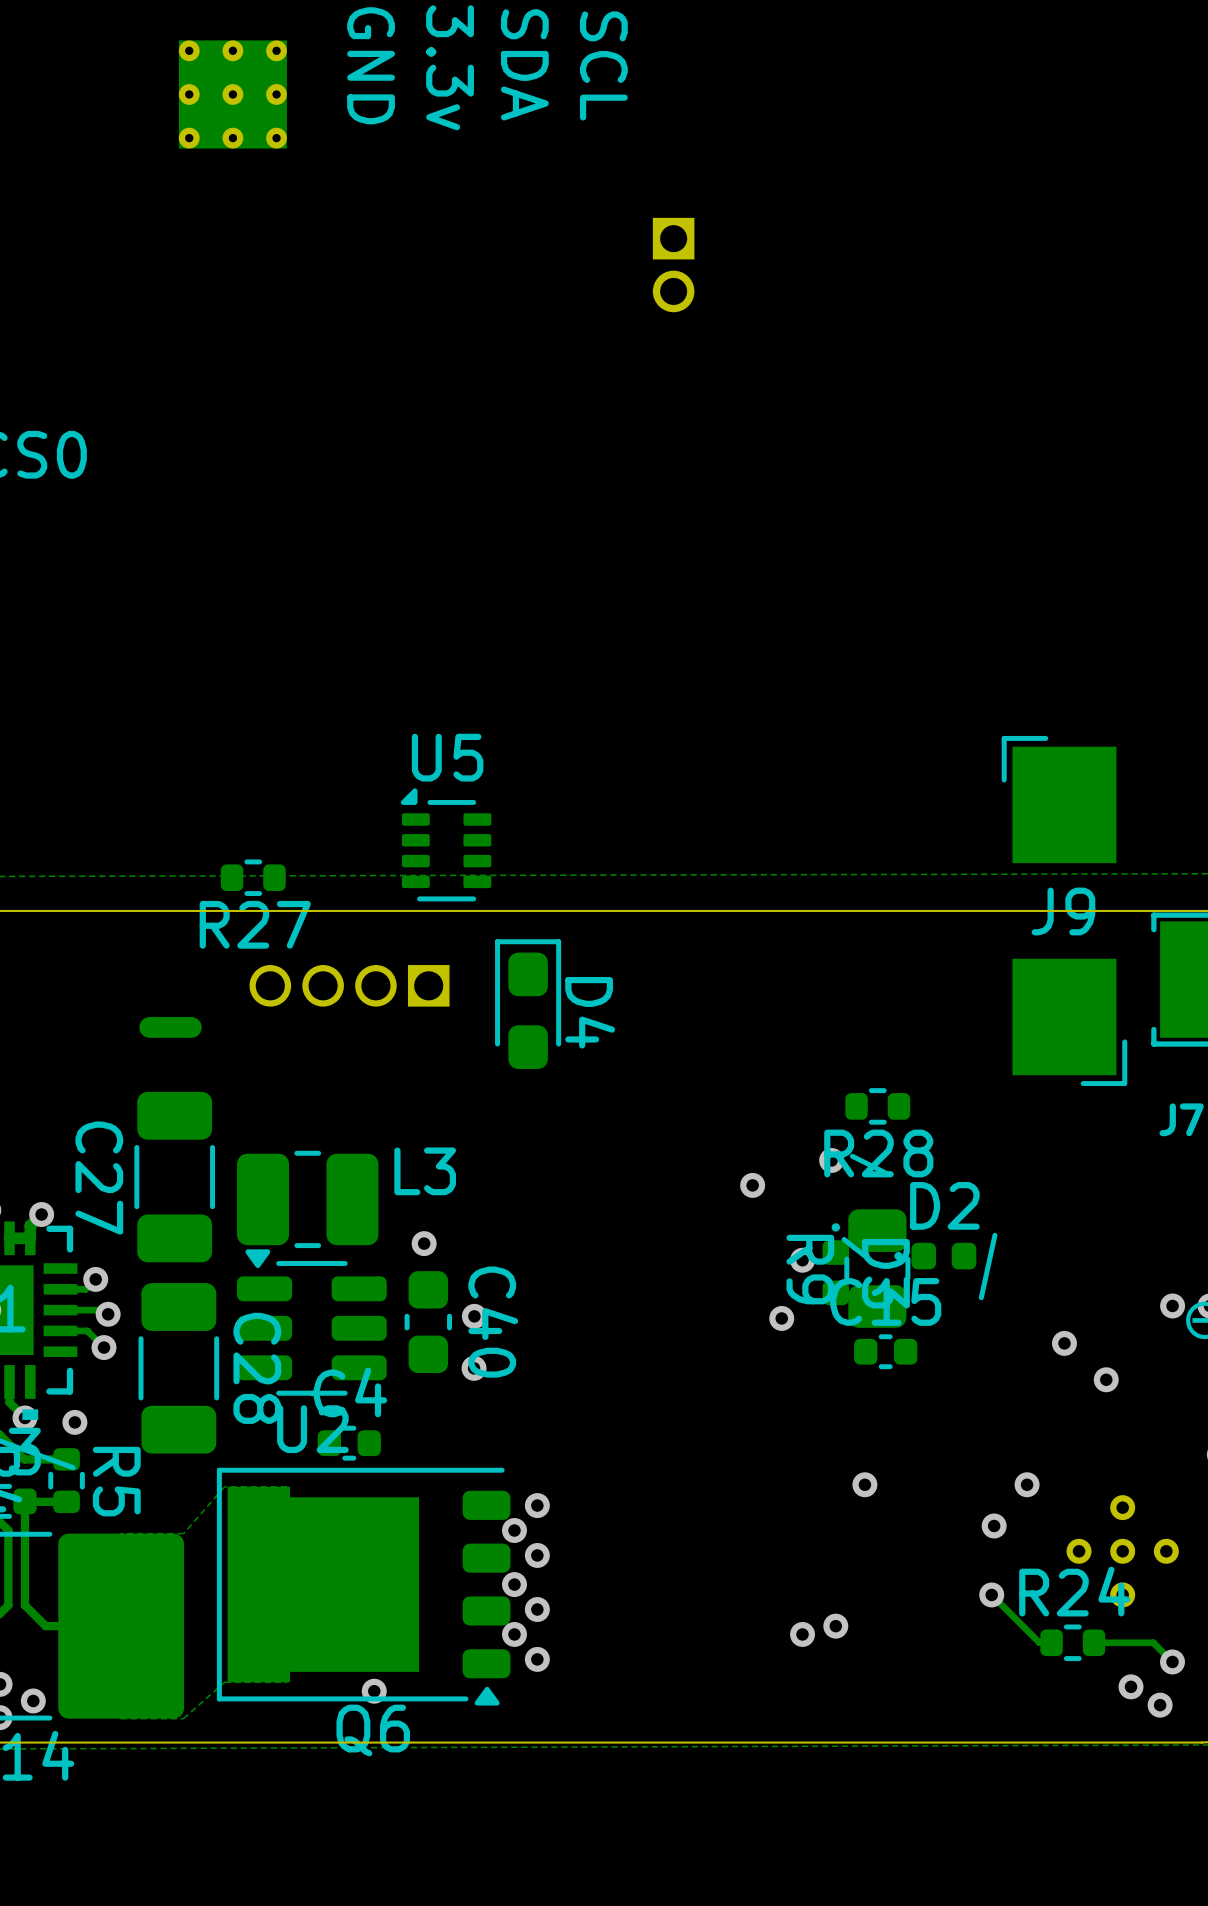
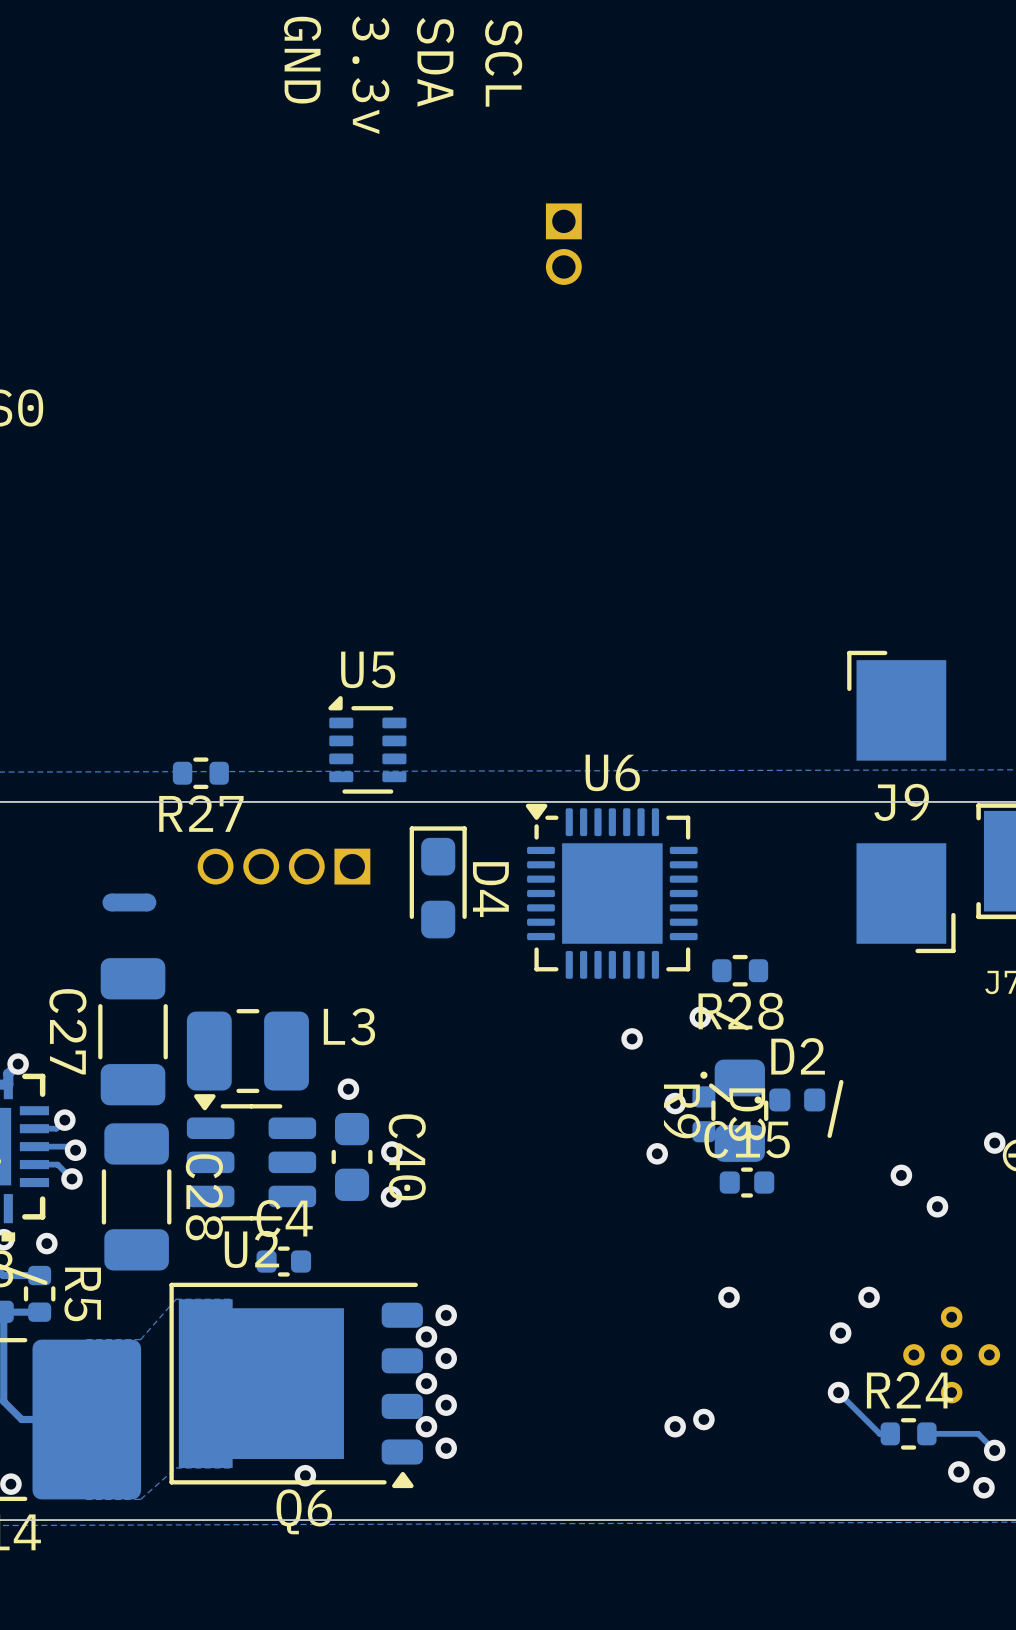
part: (232, 94) -> none
U6: none -> (611, 891)

